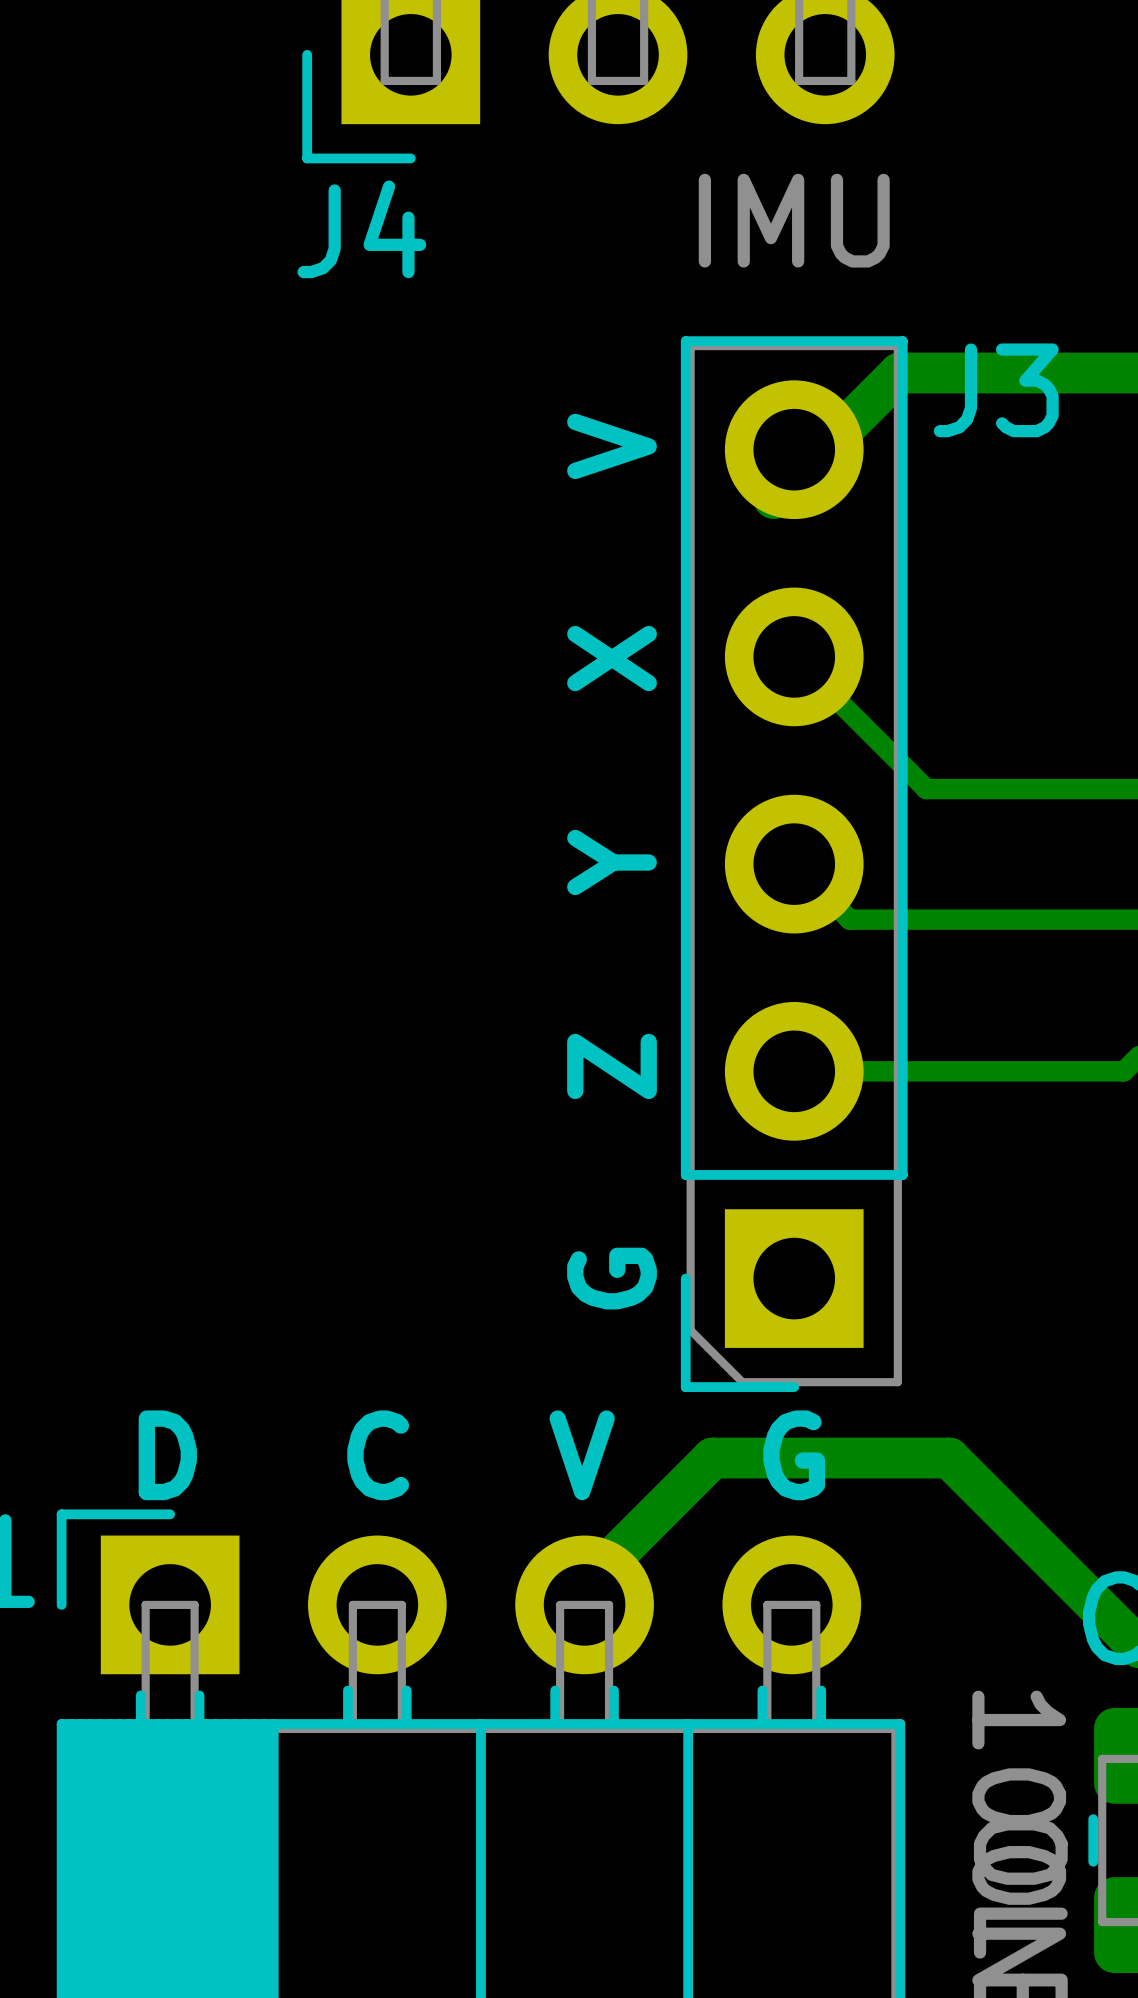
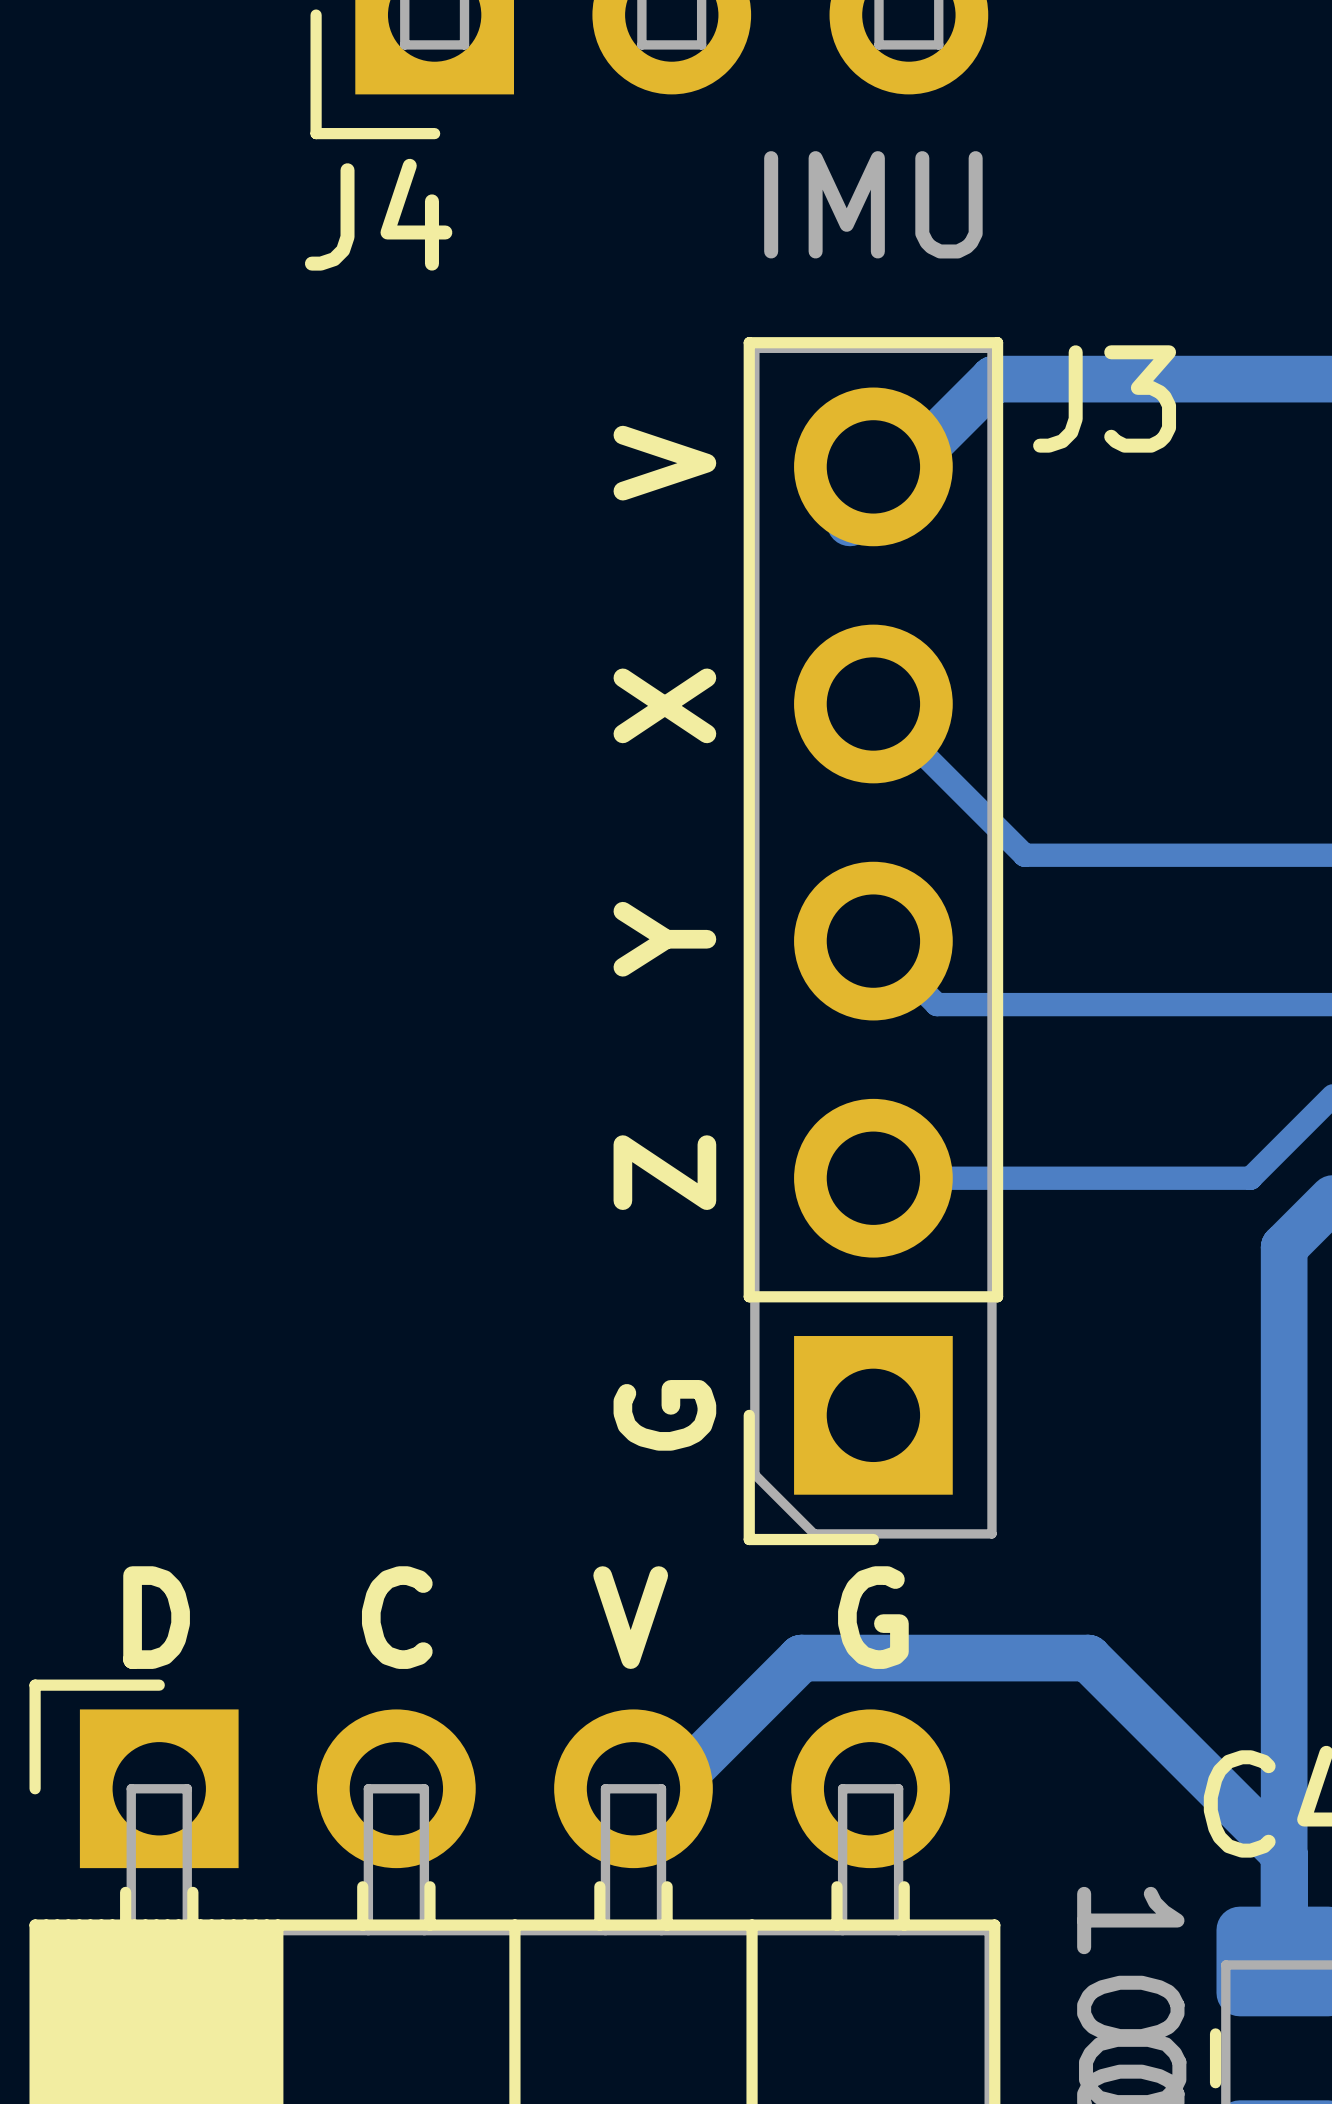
track: (981, 1490) (949, 1458) (712, 1458) (584, 1586) (584, 1637) -> (1088, 1658) (801, 1658) (633, 1826)

